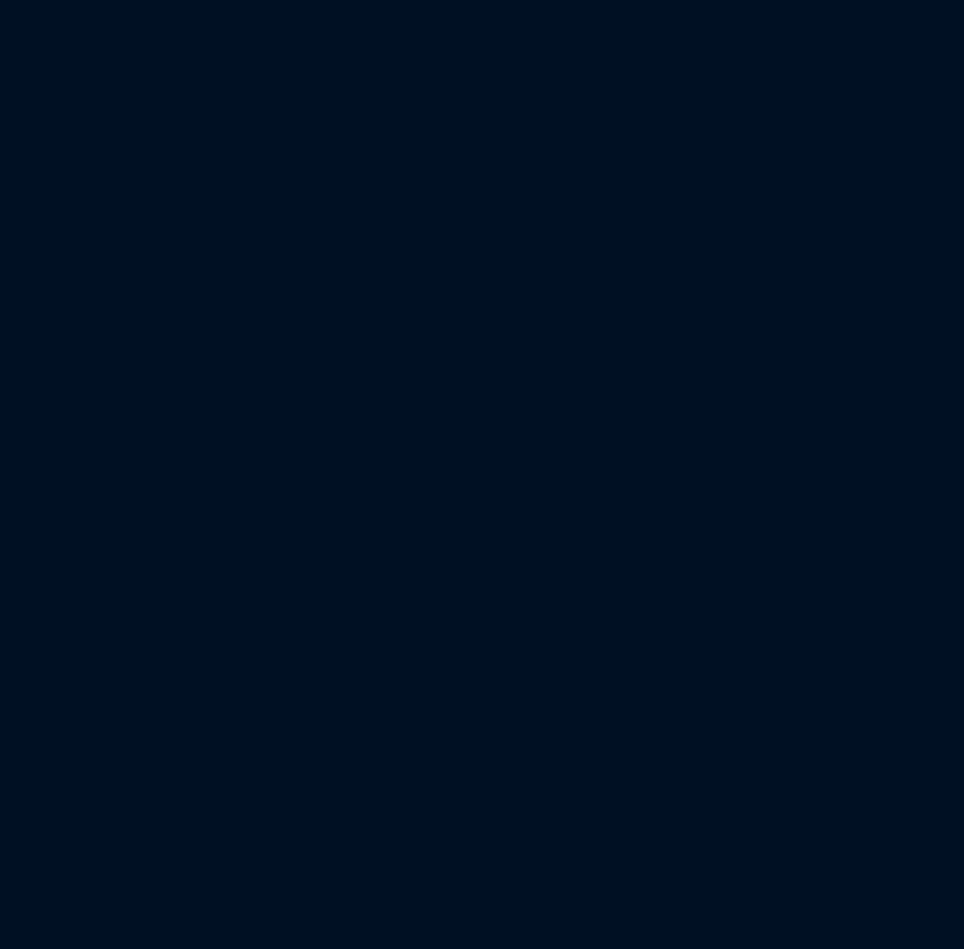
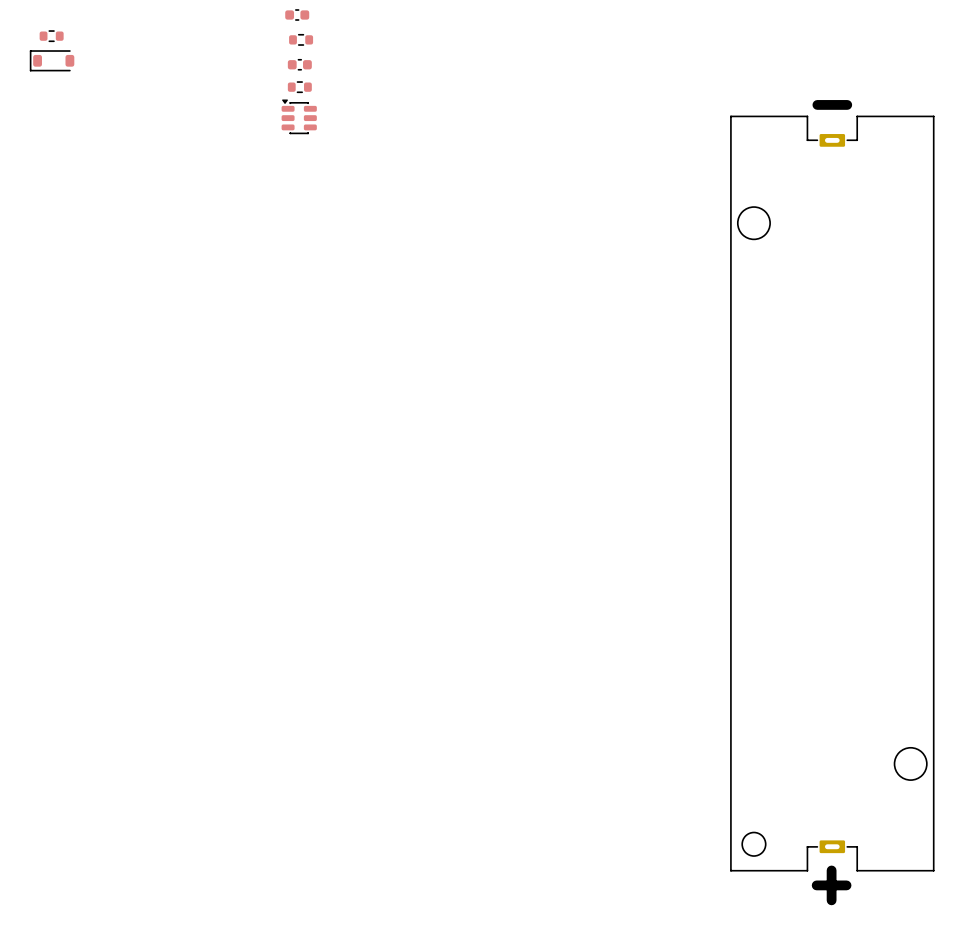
part: none -> (297, 15)
part: none -> (51, 36)
part: none -> (301, 39)
part: none -> (52, 60)
part: none -> (299, 64)
part: none -> (299, 87)
part: none -> (299, 116)
part: none -> (832, 493)

